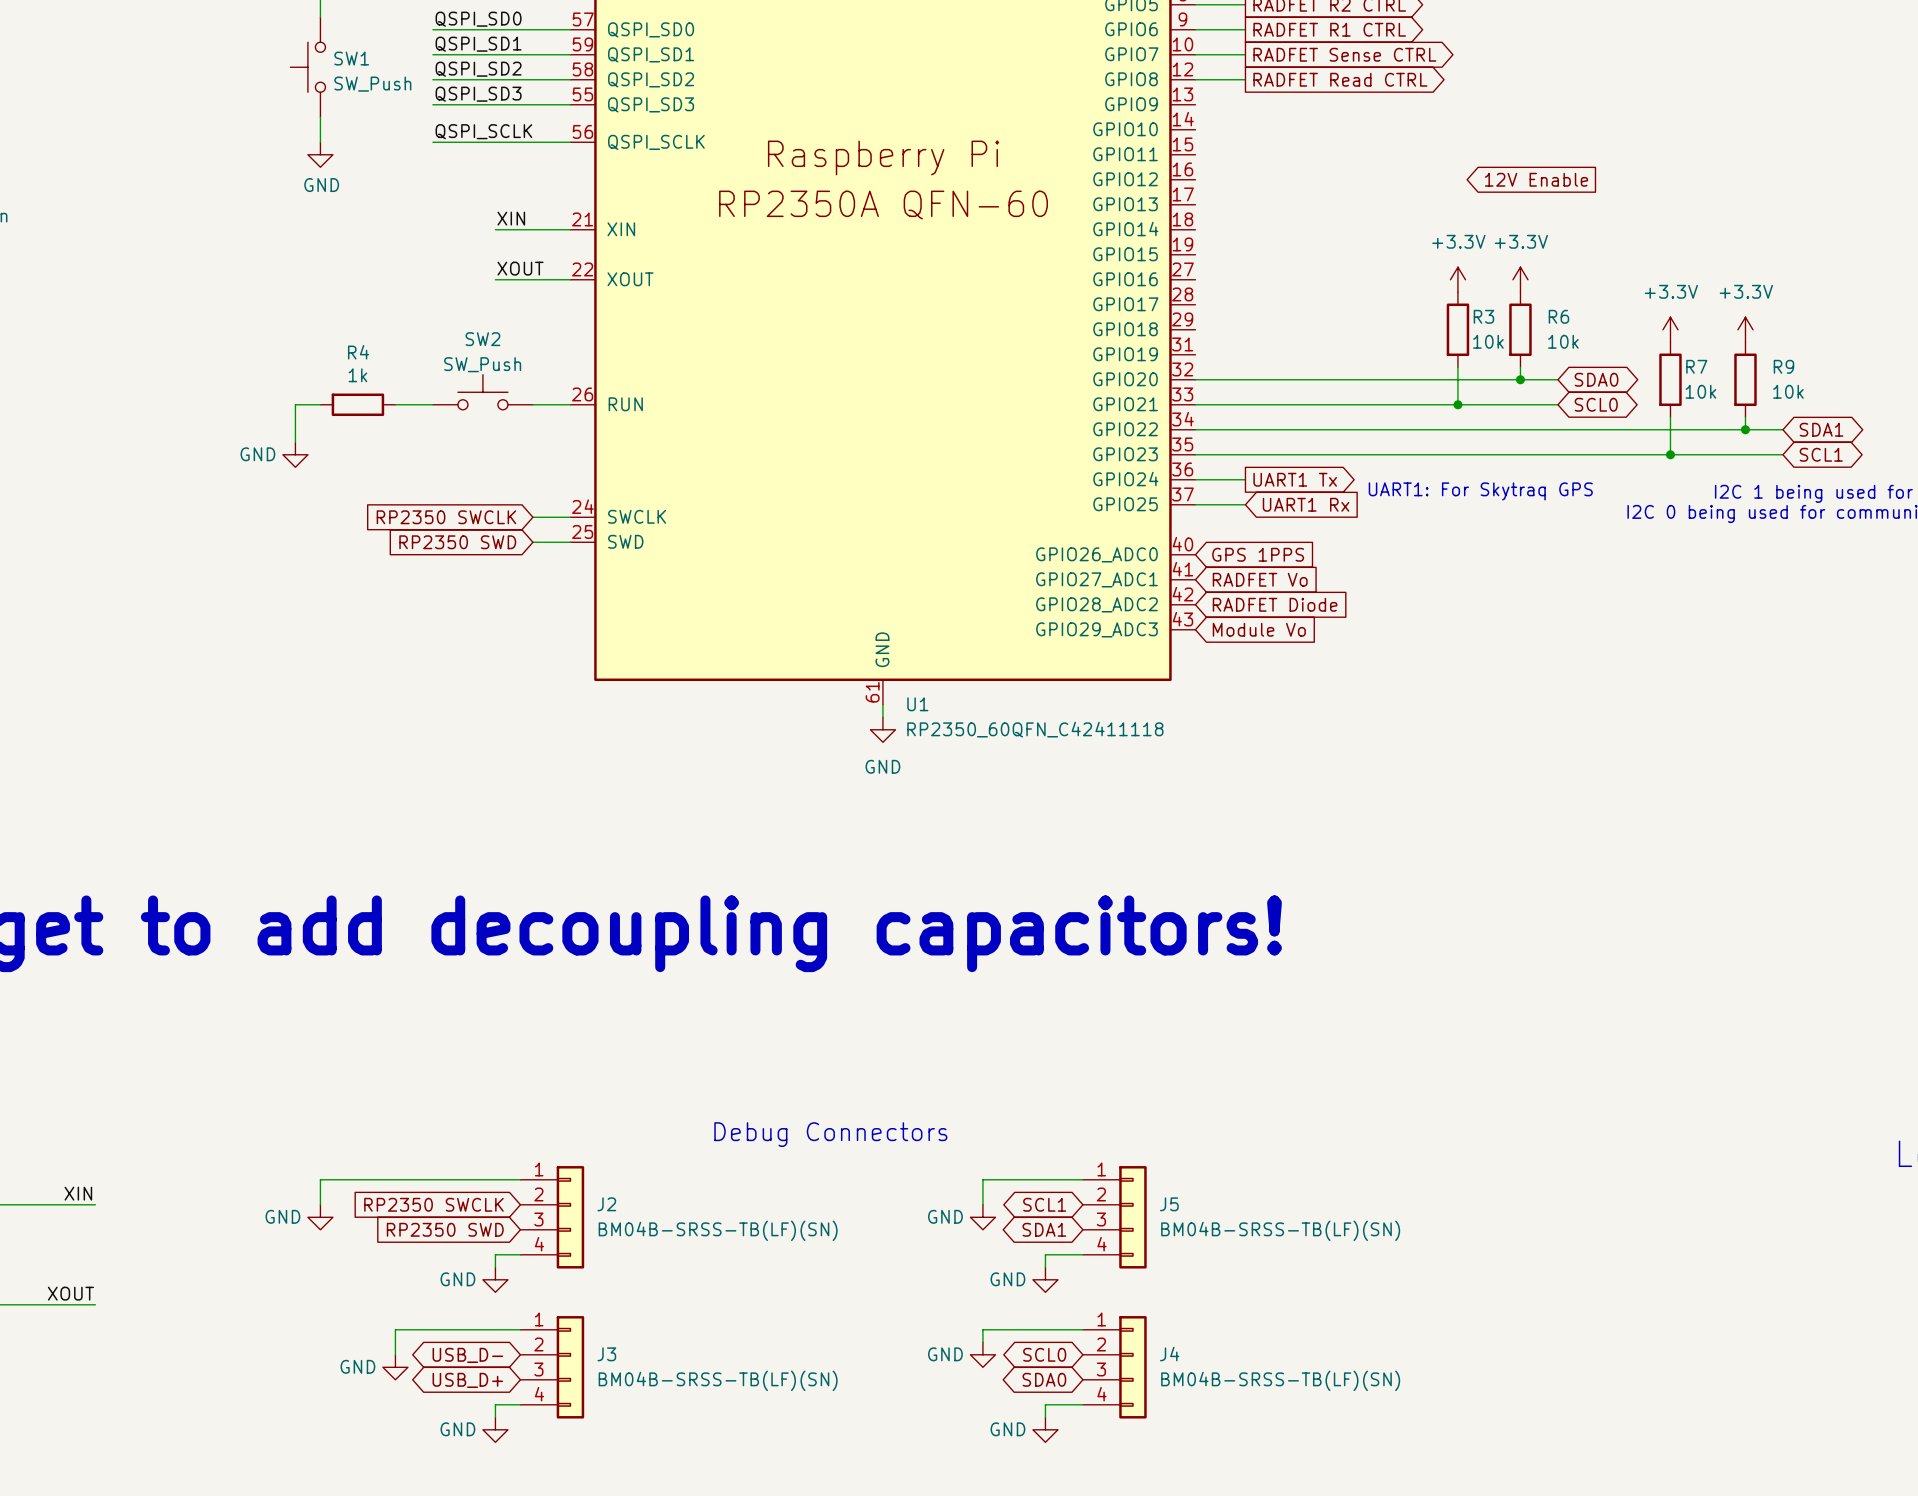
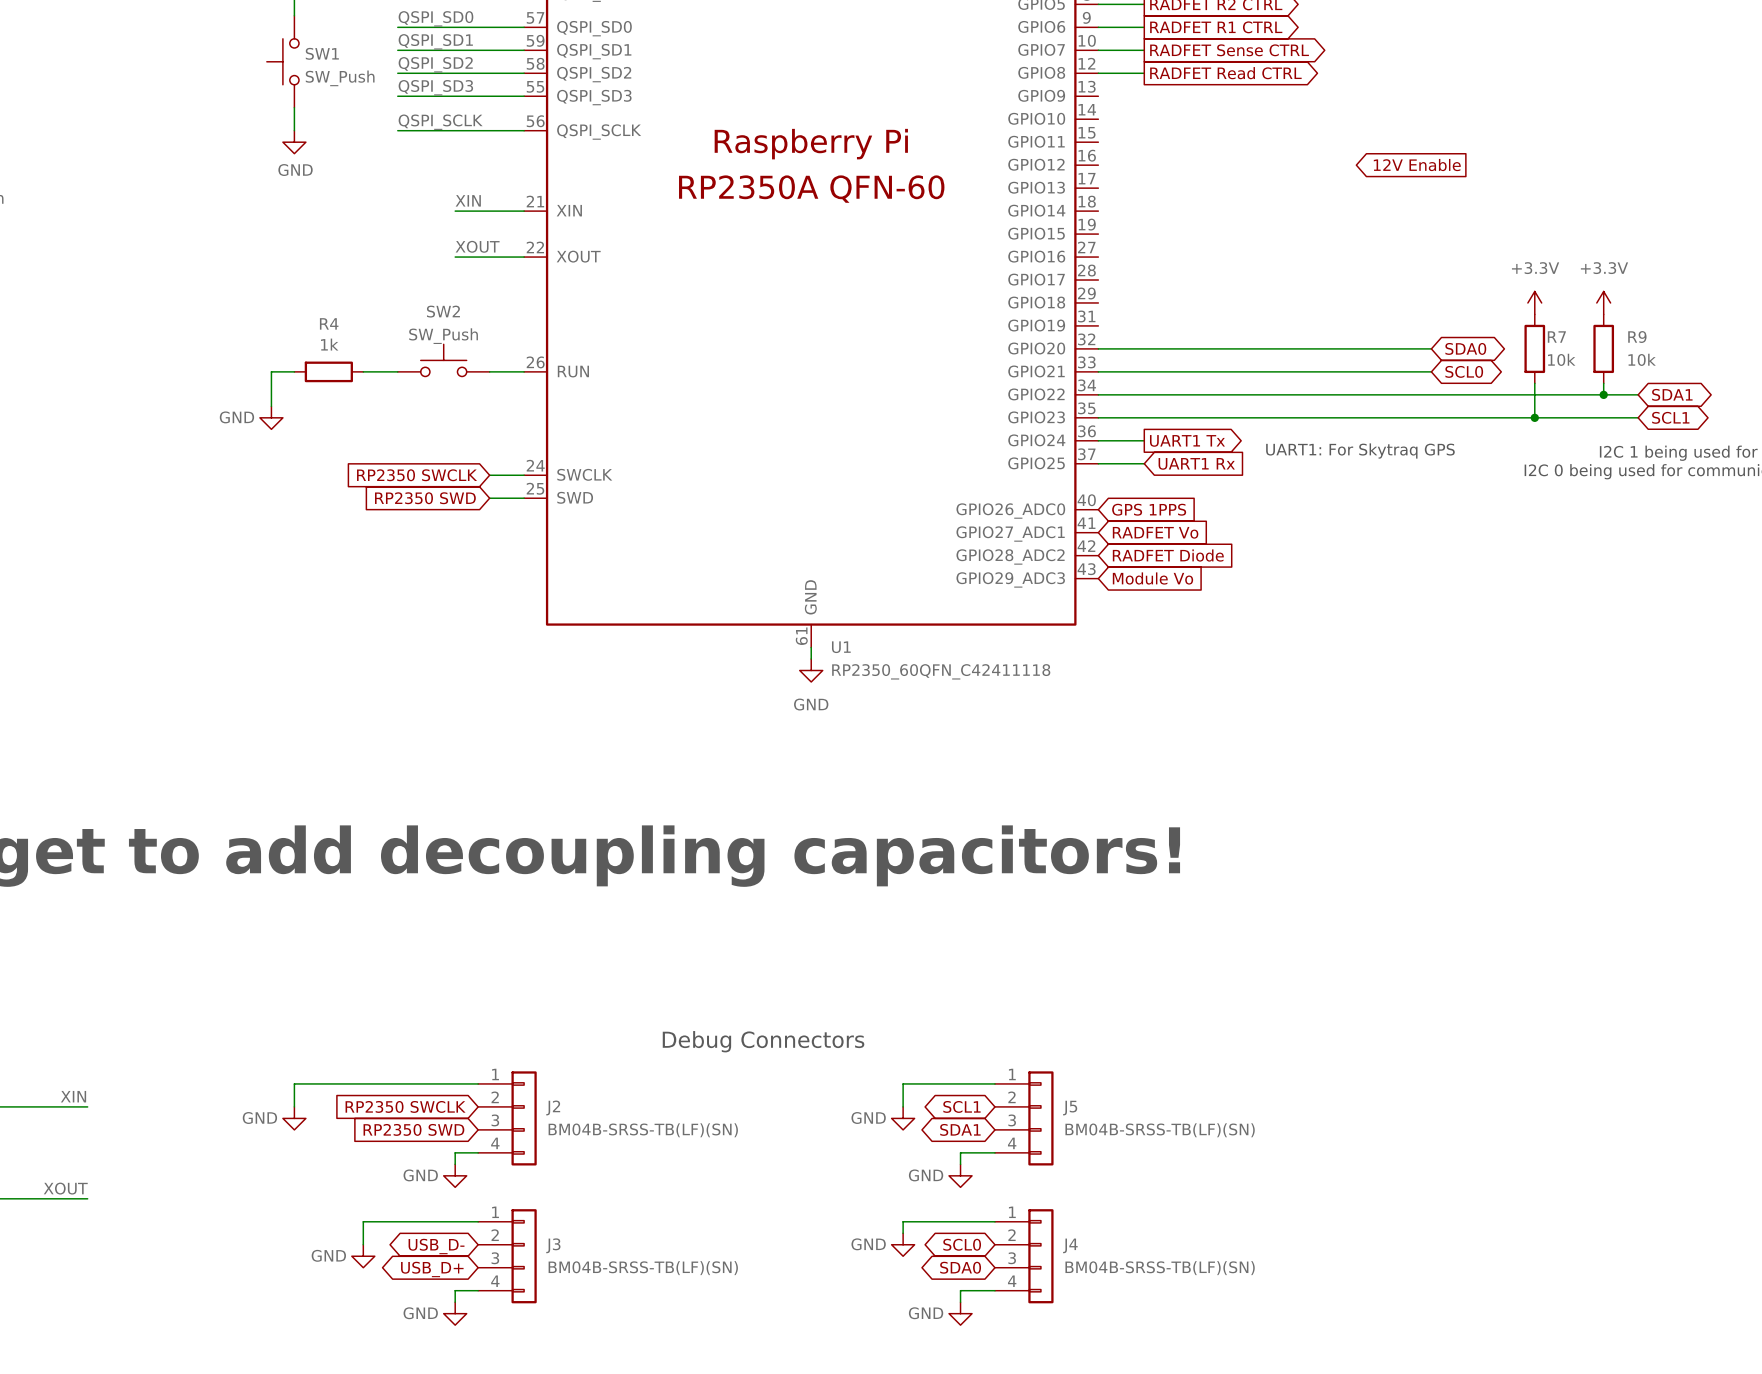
power symbol: +3.3V (1457, 279) -> none
power symbol: +3.3V (1520, 279) -> none
R3: 10k (1457, 329) -> none
R6: 10k (1520, 329) -> none
wire: (1457, 367) (1457, 404) -> none
wire: (1520, 367) (1520, 379) -> none
junction: (1520, 379) -> none
junction: (1457, 404) -> none

